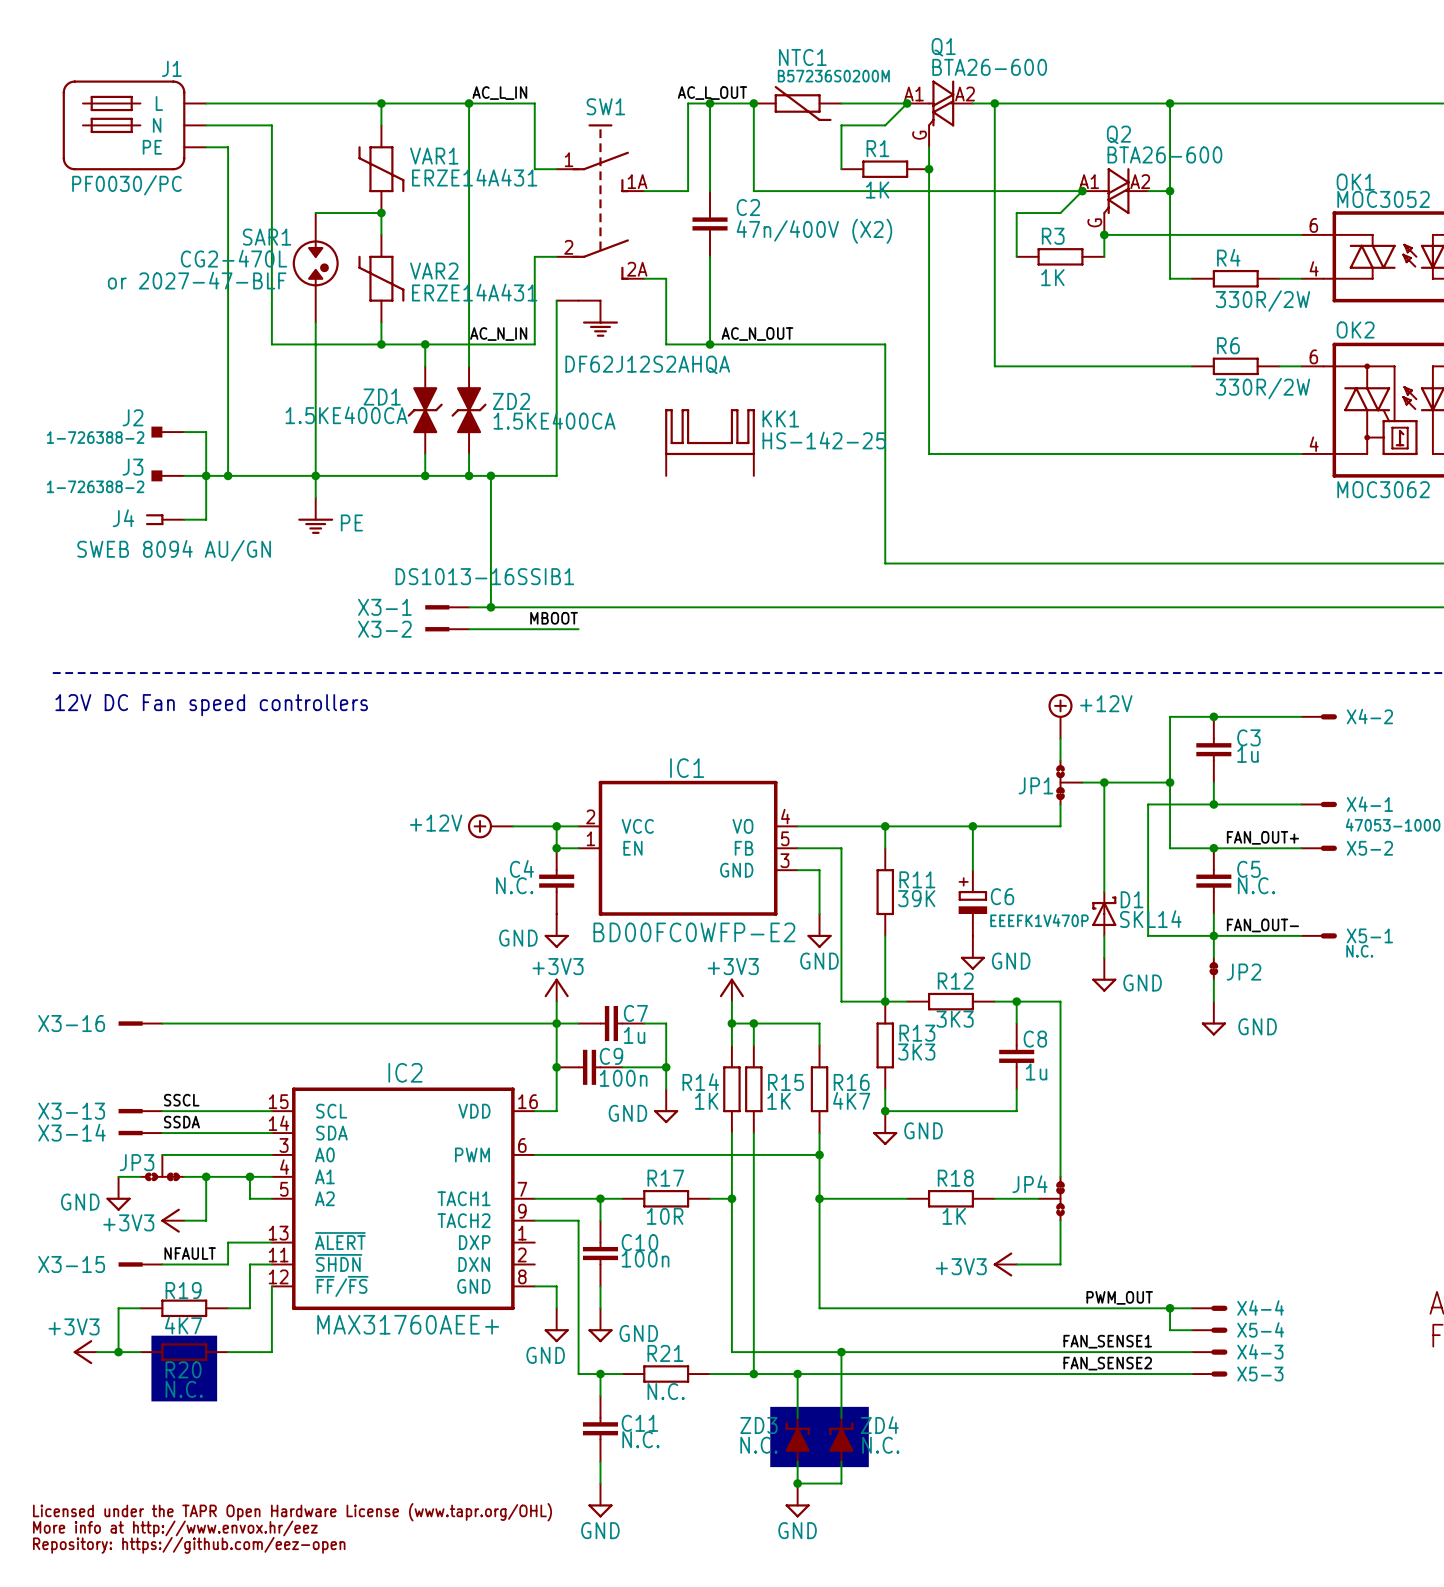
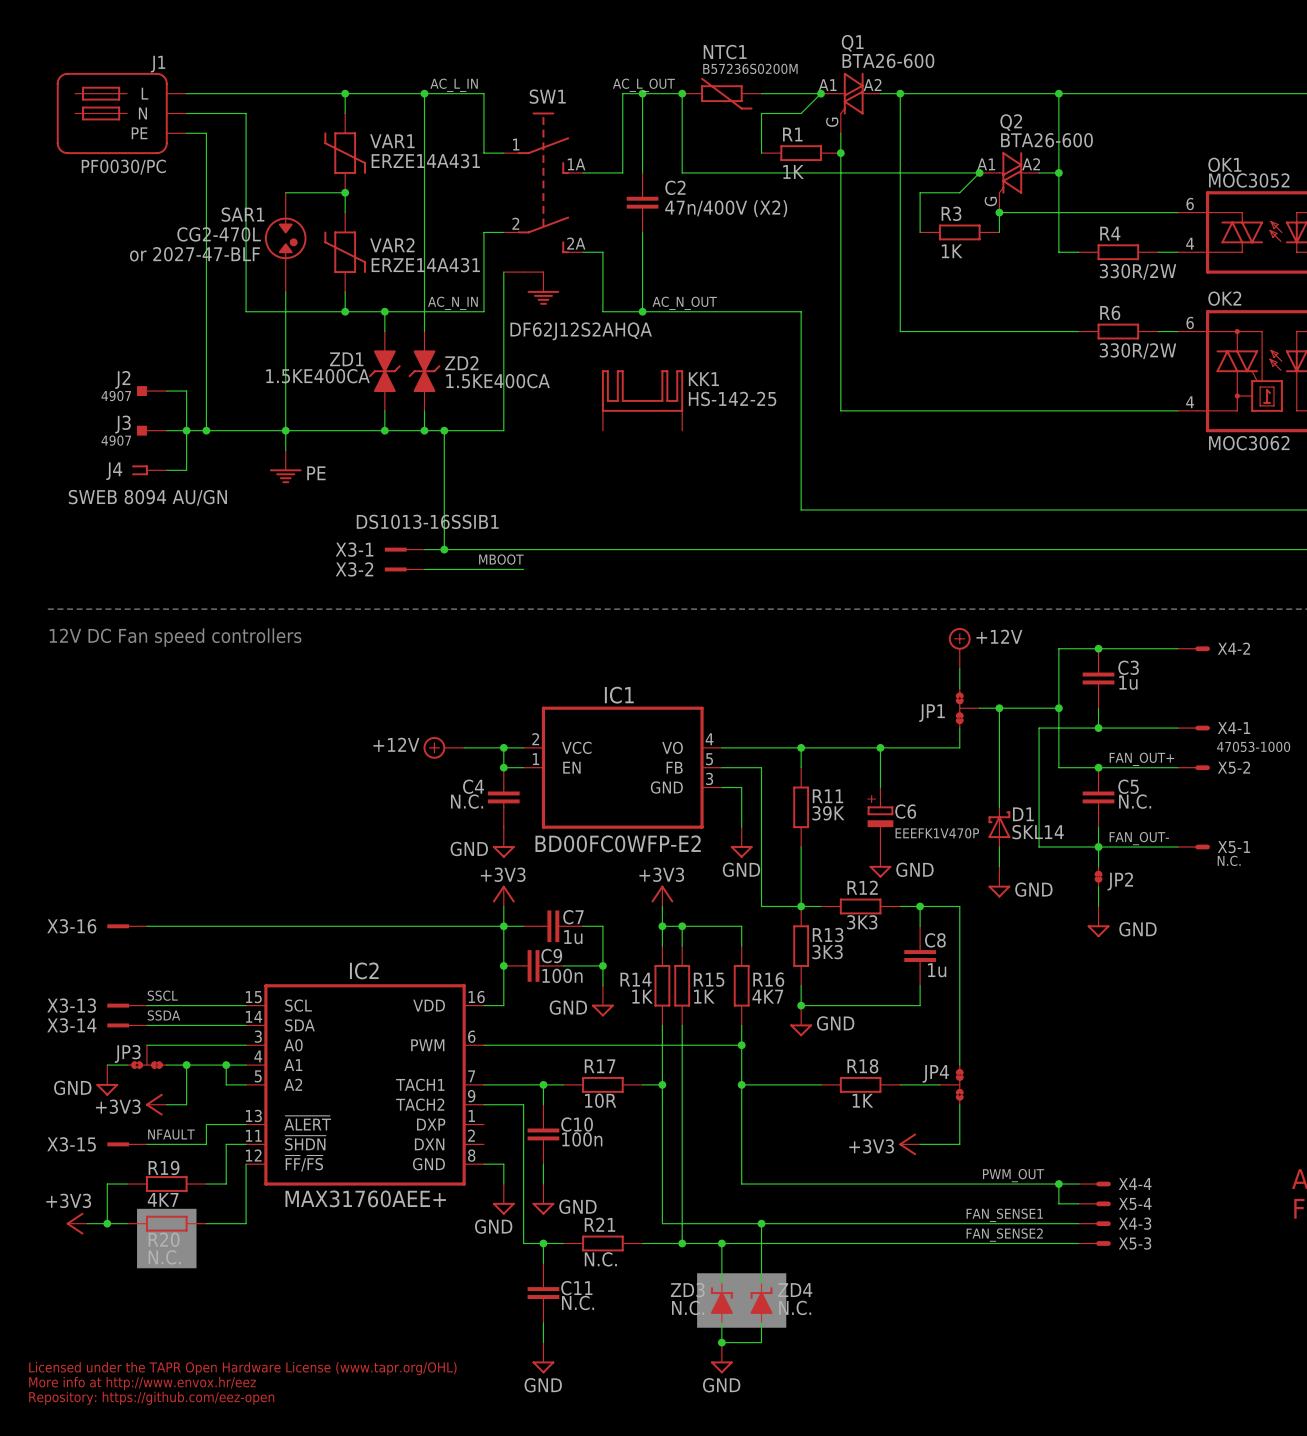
J2 value: 1-726388-2 (95, 437) -> 4907 (116, 395)
J3 value: 1-726388-2 (95, 486) -> 4907 (116, 440)

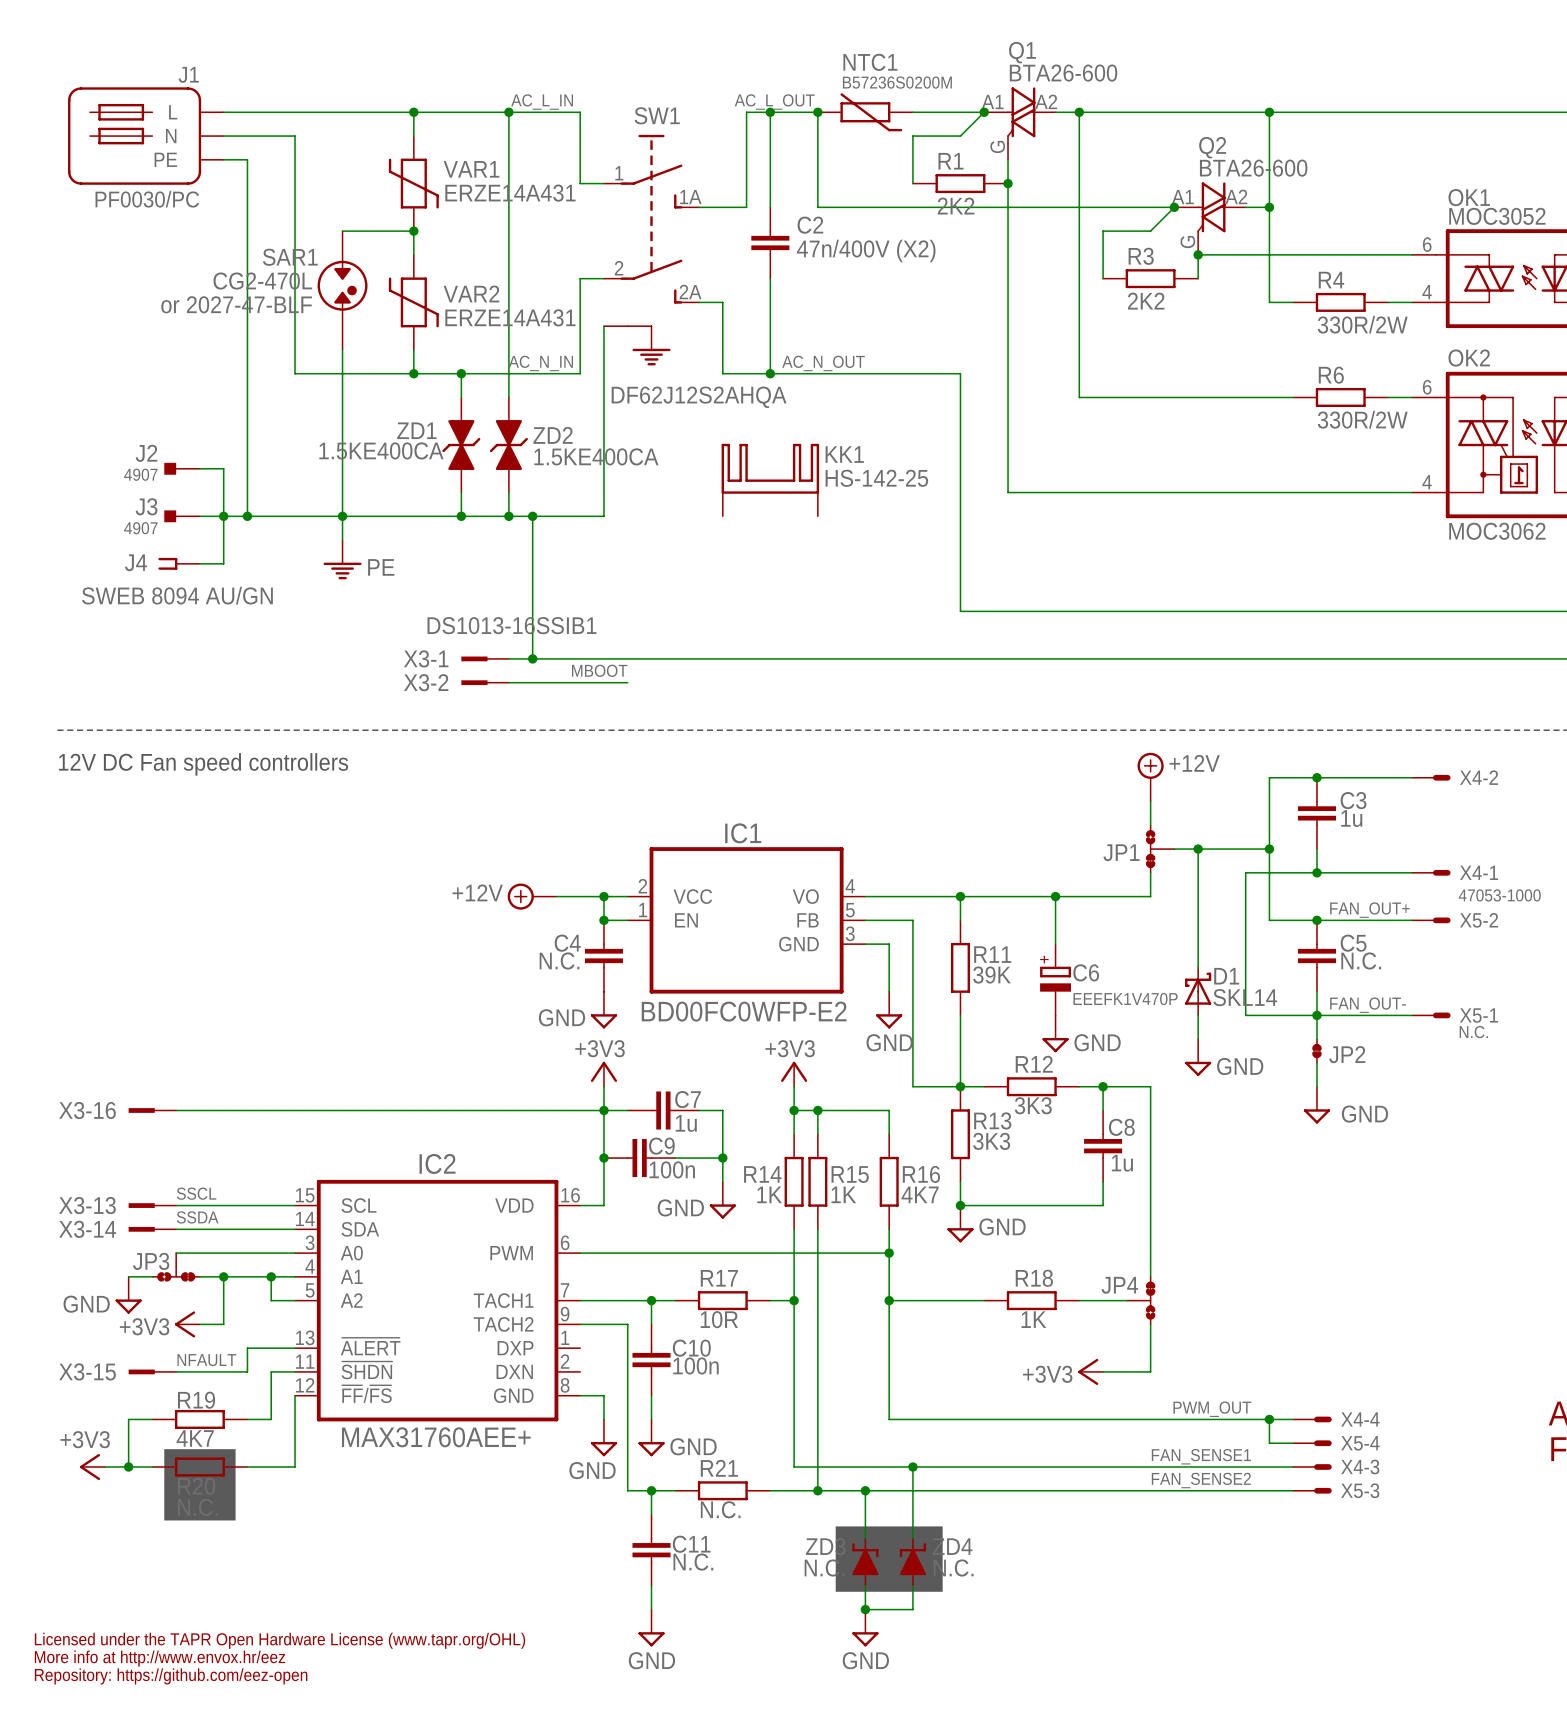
R1 value: 1K (793, 171) -> 2K2 (956, 206)
R3 value: 1K (952, 251) -> 2K2 (1146, 301)

